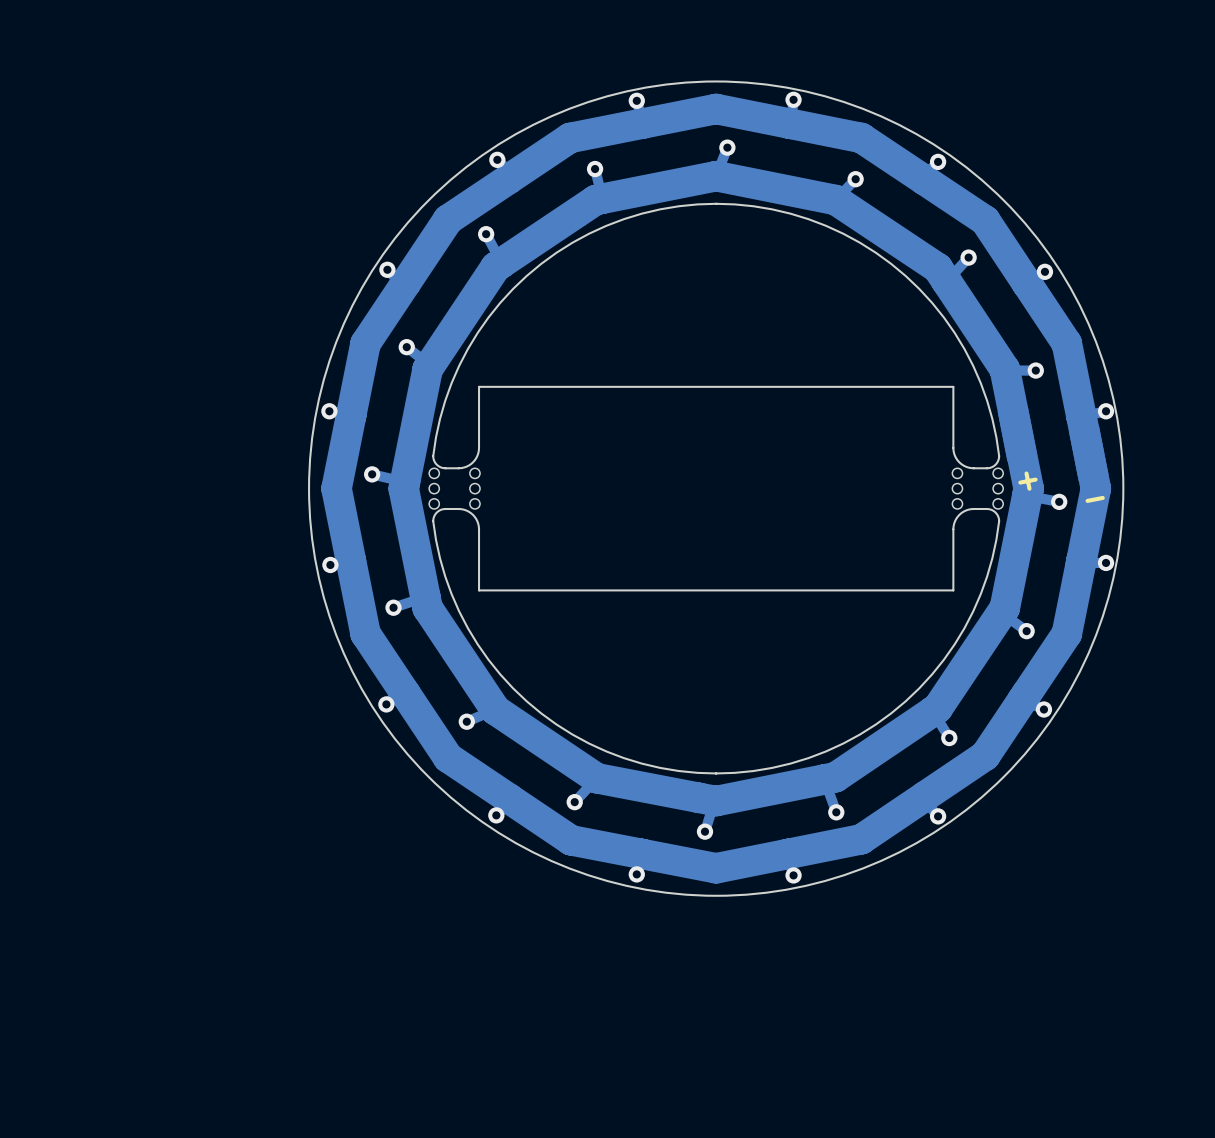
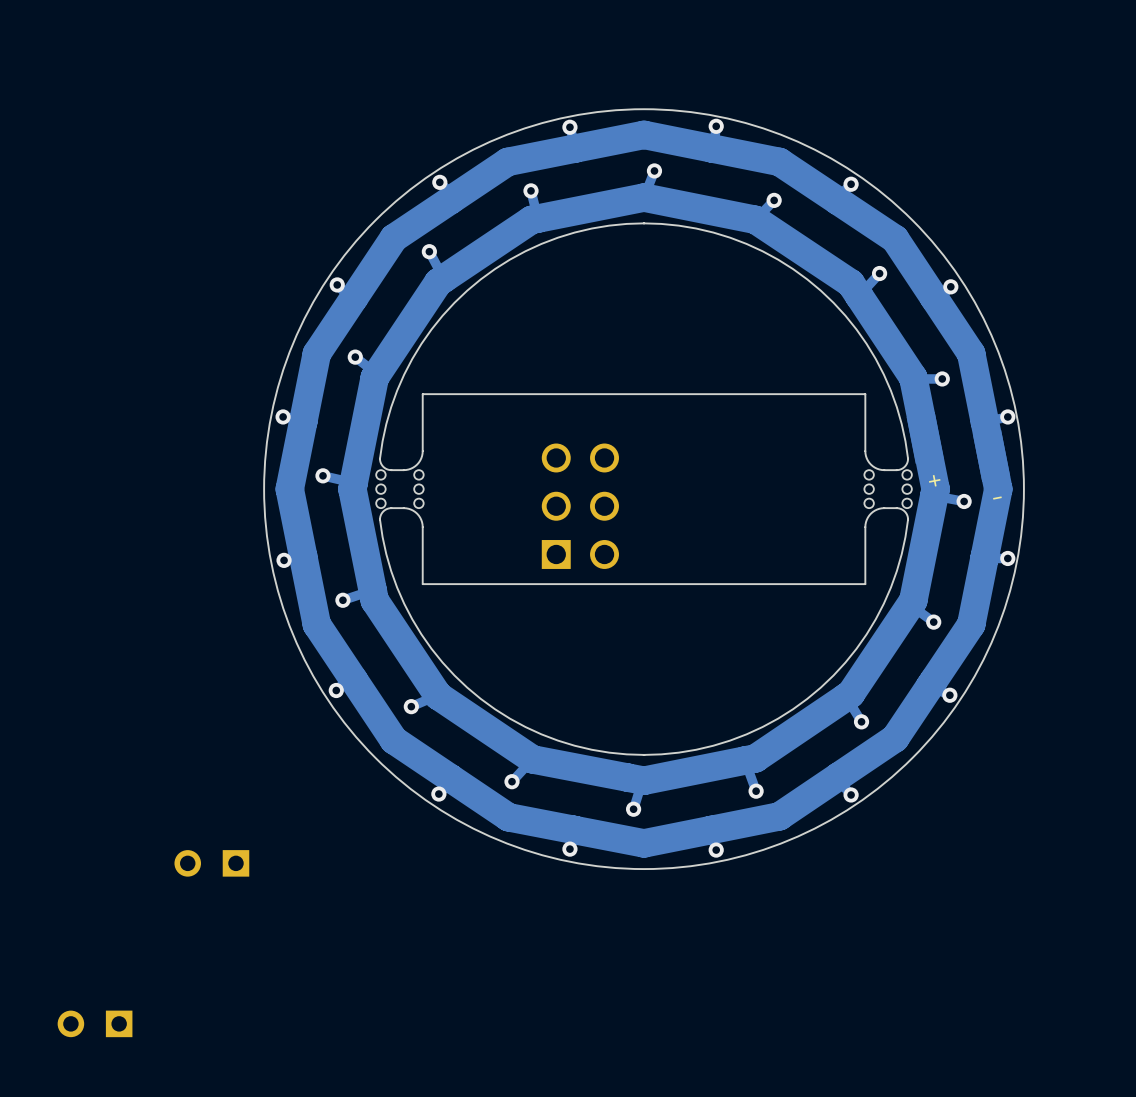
part: none -> (580, 506)
part: none -> (211, 863)
part: none -> (95, 1023)

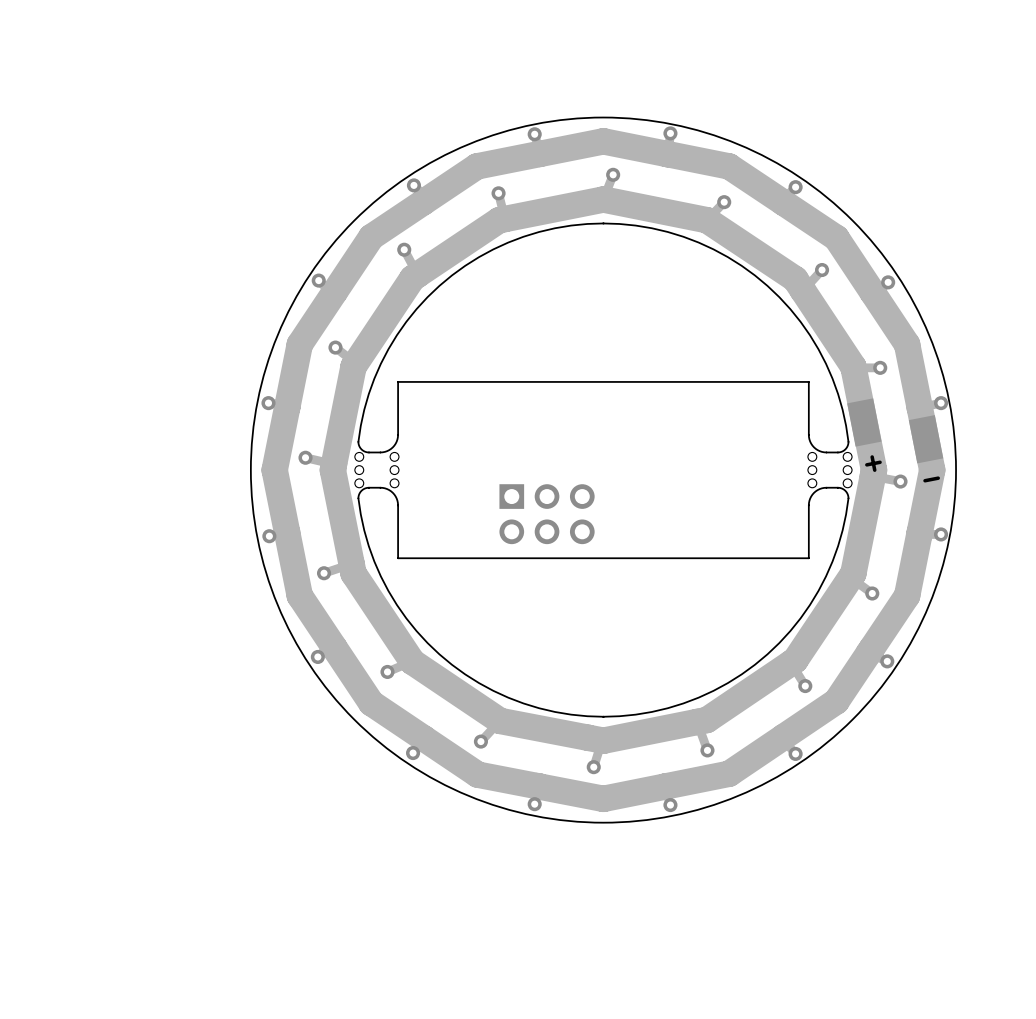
part: (580, 506) -> none
part: none -> (547, 514)
part: (211, 863) -> none
part: (95, 1023) -> none

